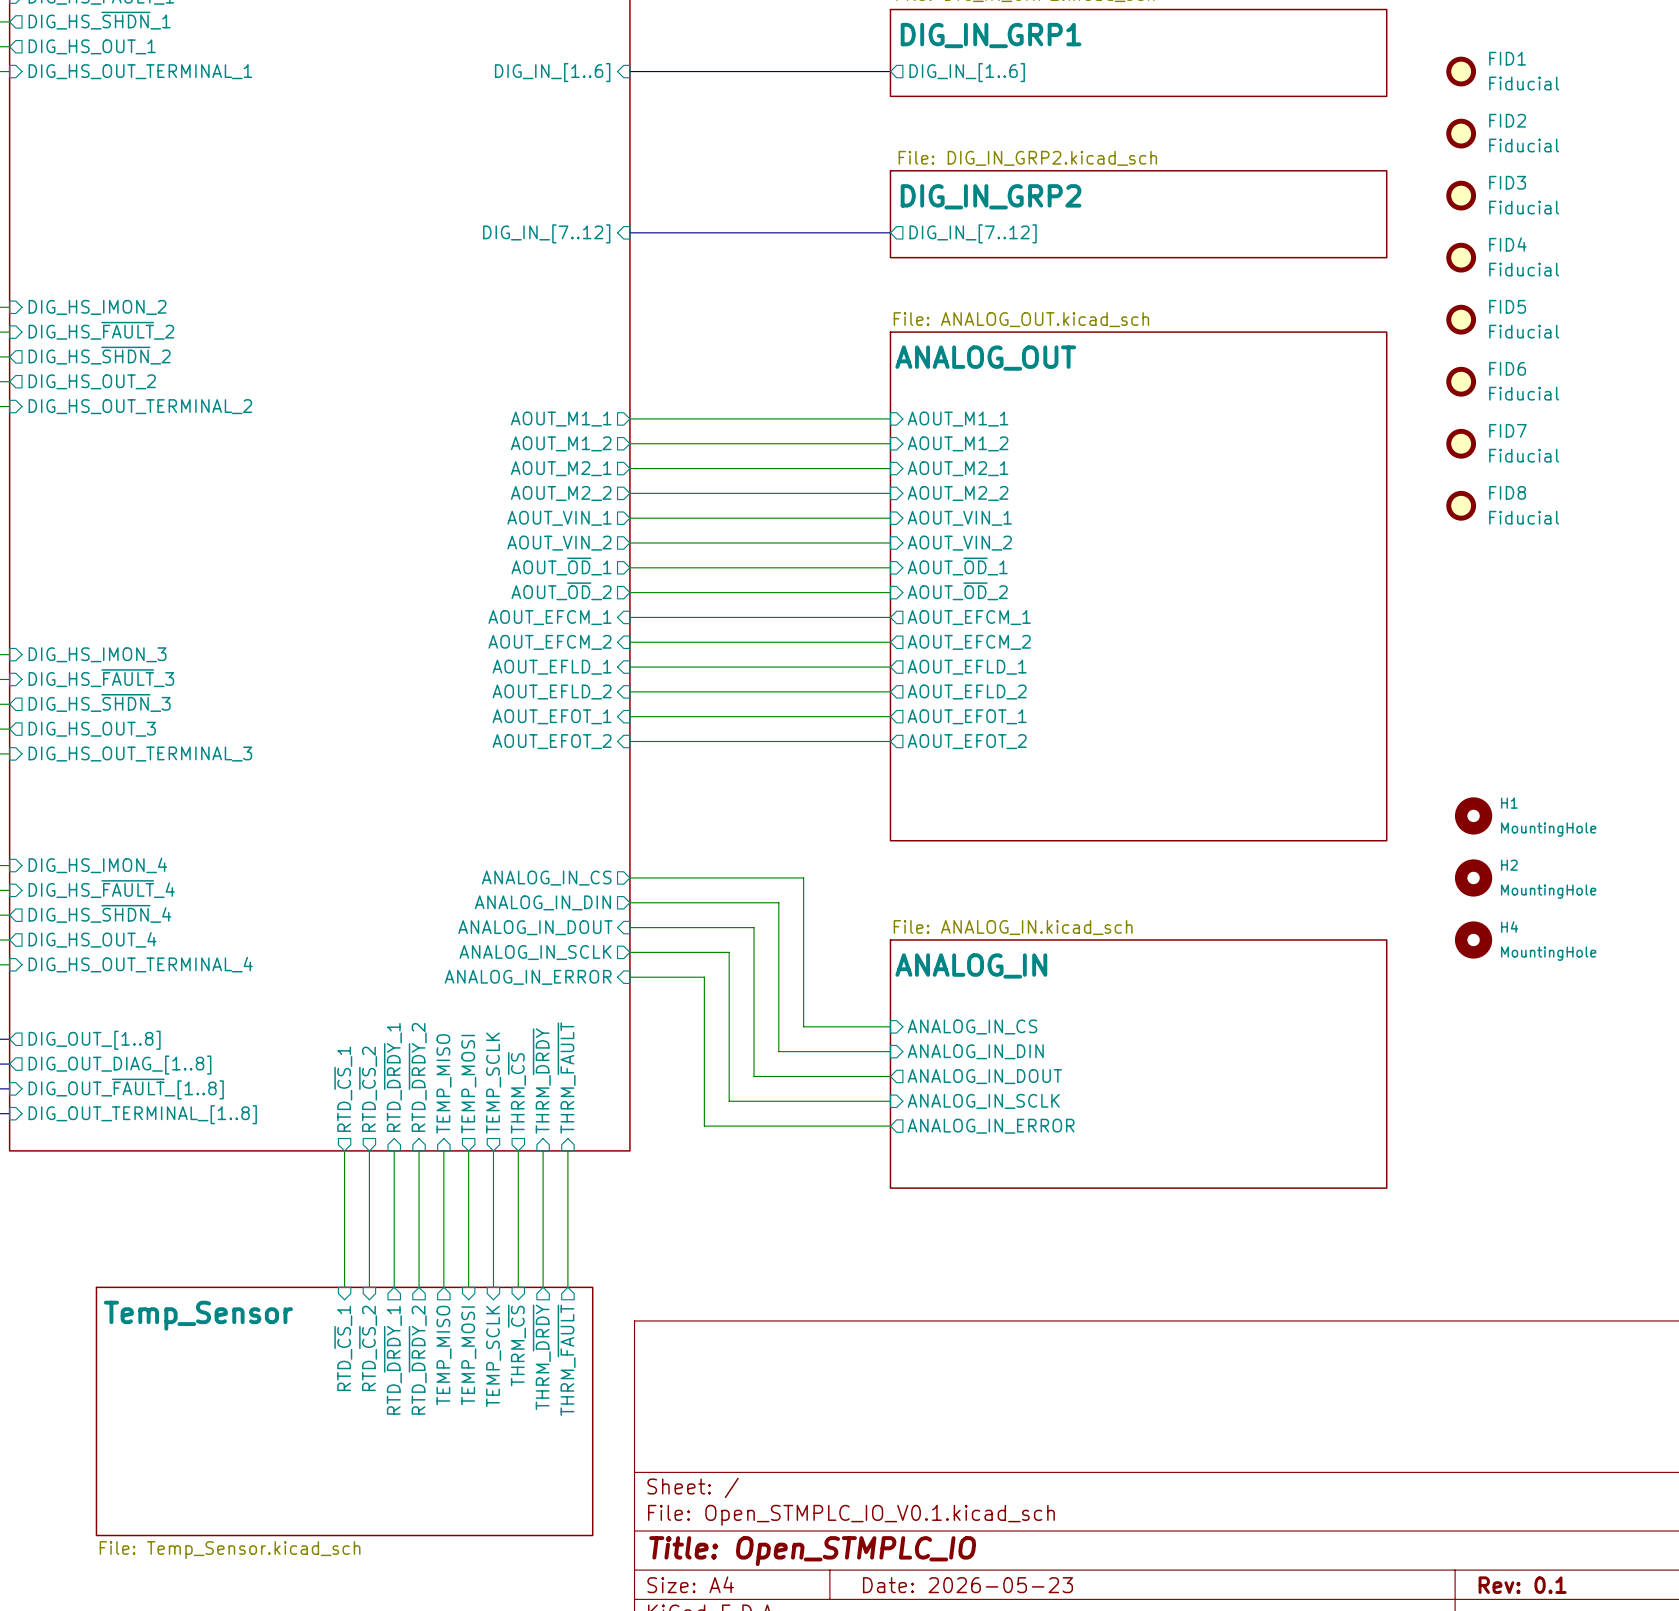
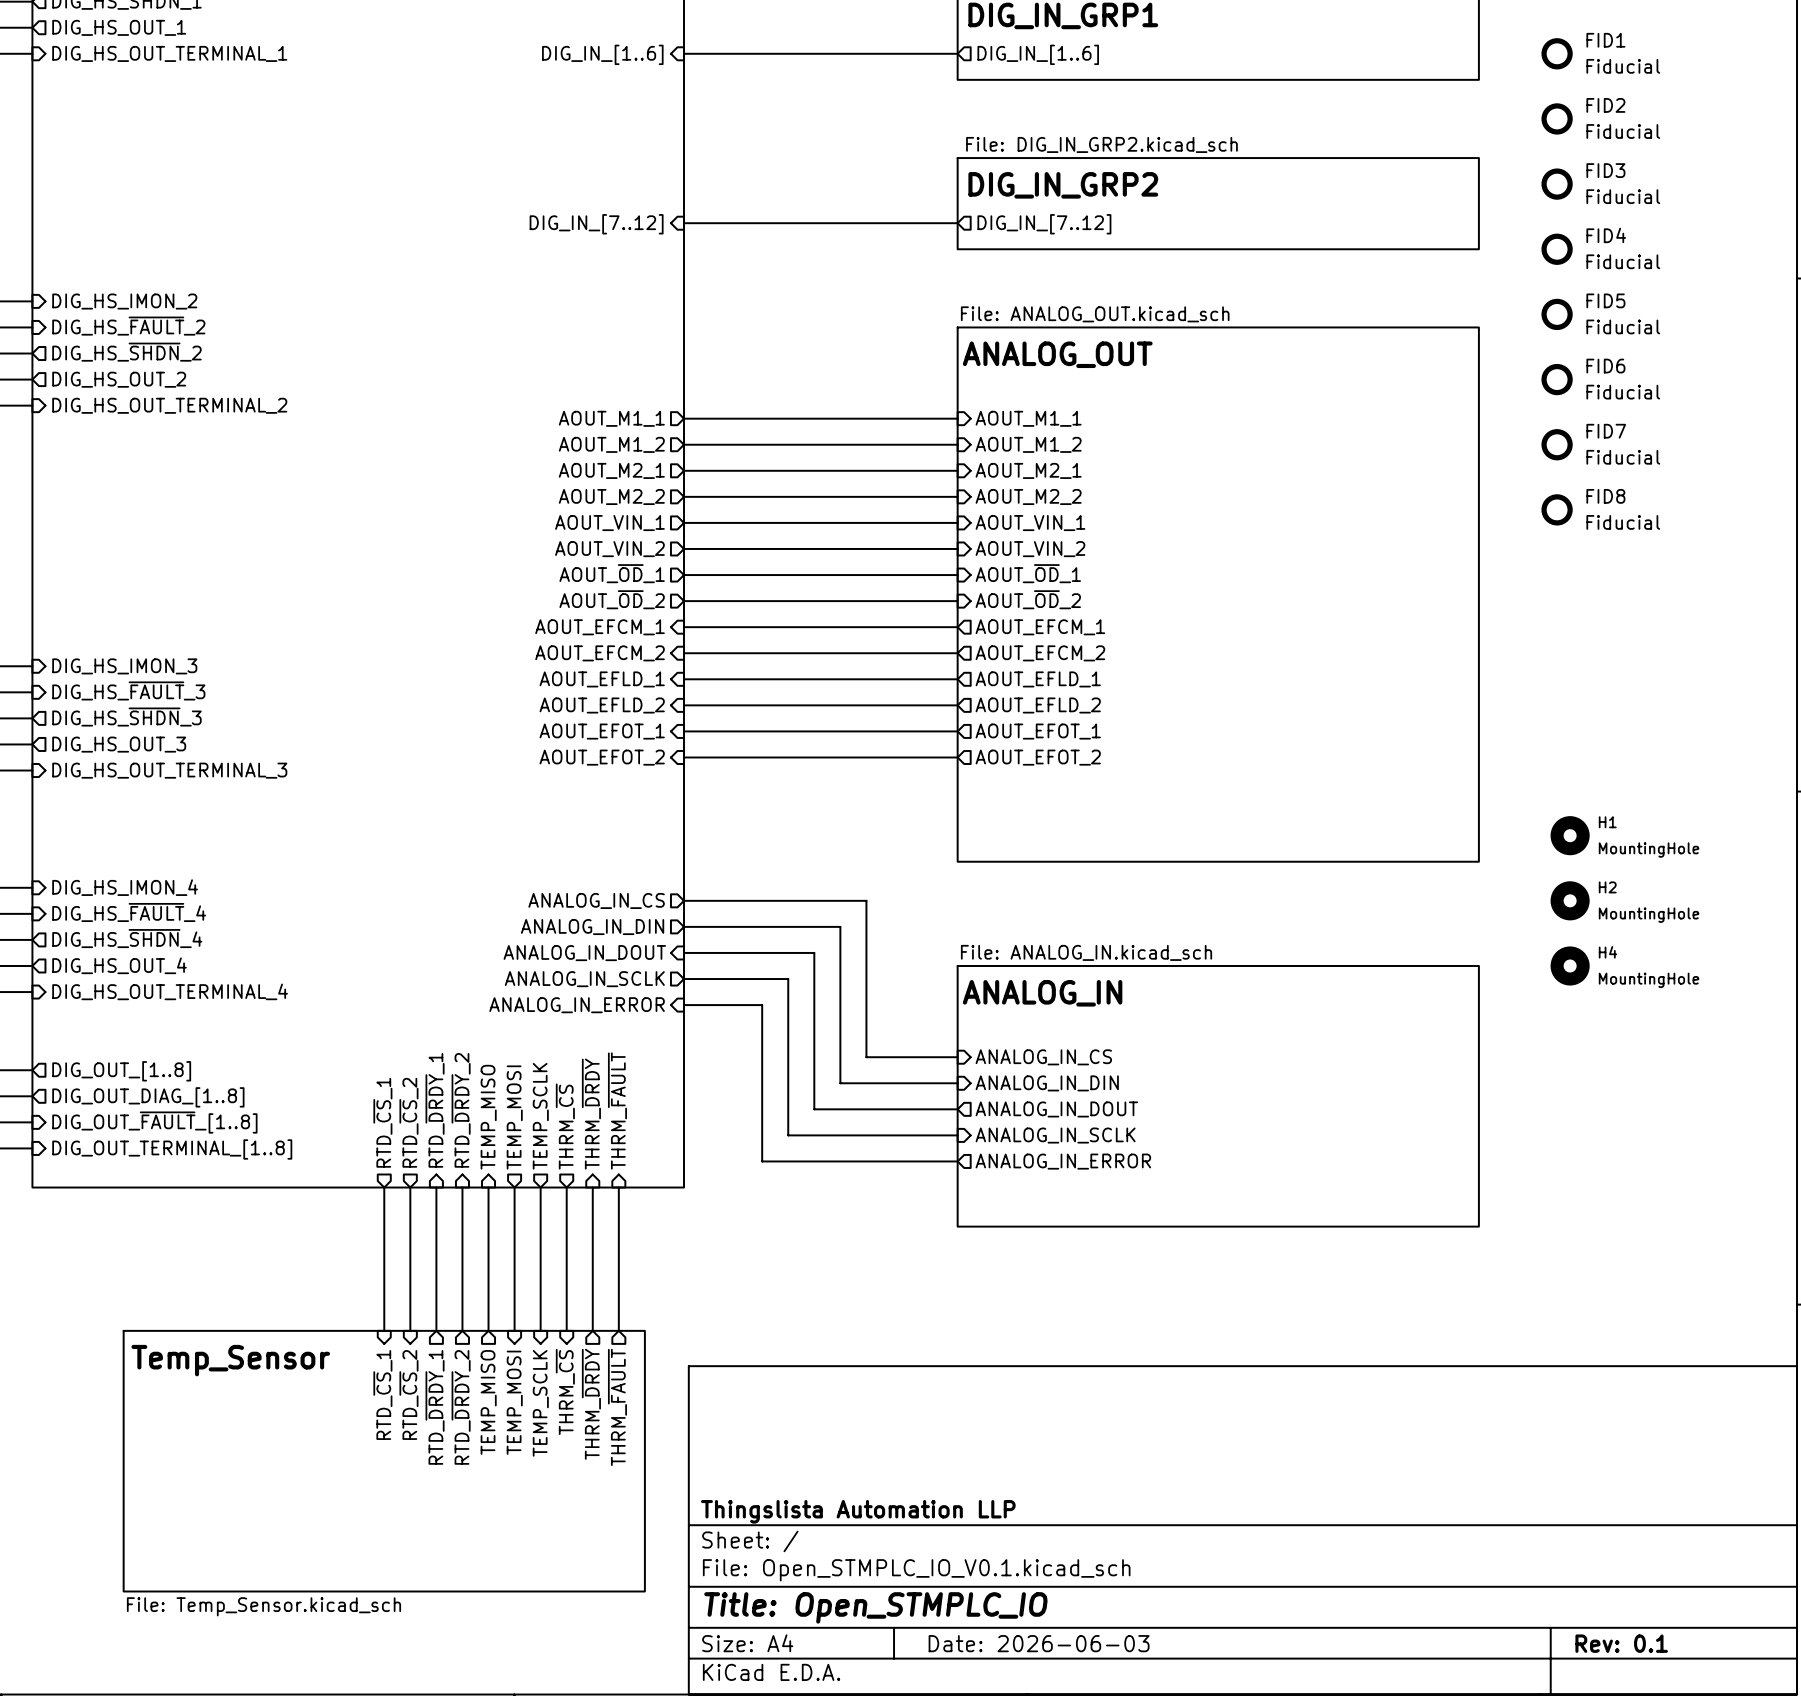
title block: none -> Thingslista Automation LLP (858, 1511)
title block: Date: 2026-05-23 (967, 1585) -> Date: 2026-06-03 (1039, 1643)

